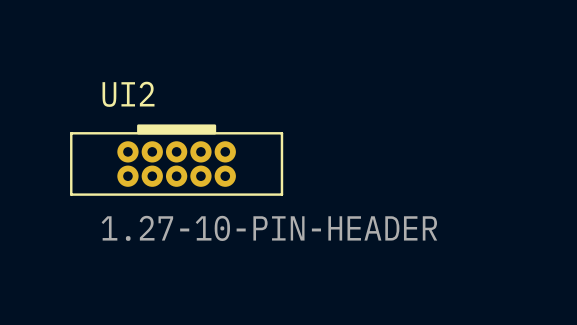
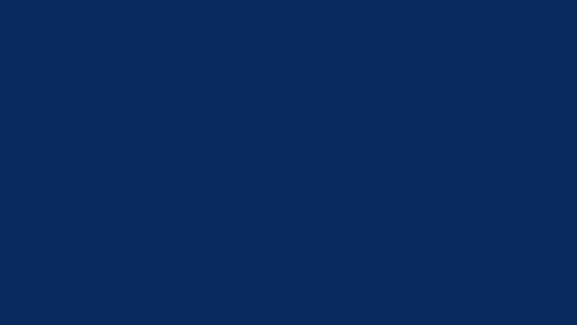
UI2: 1.27-10-PIN-HEADER (176, 160) -> none

